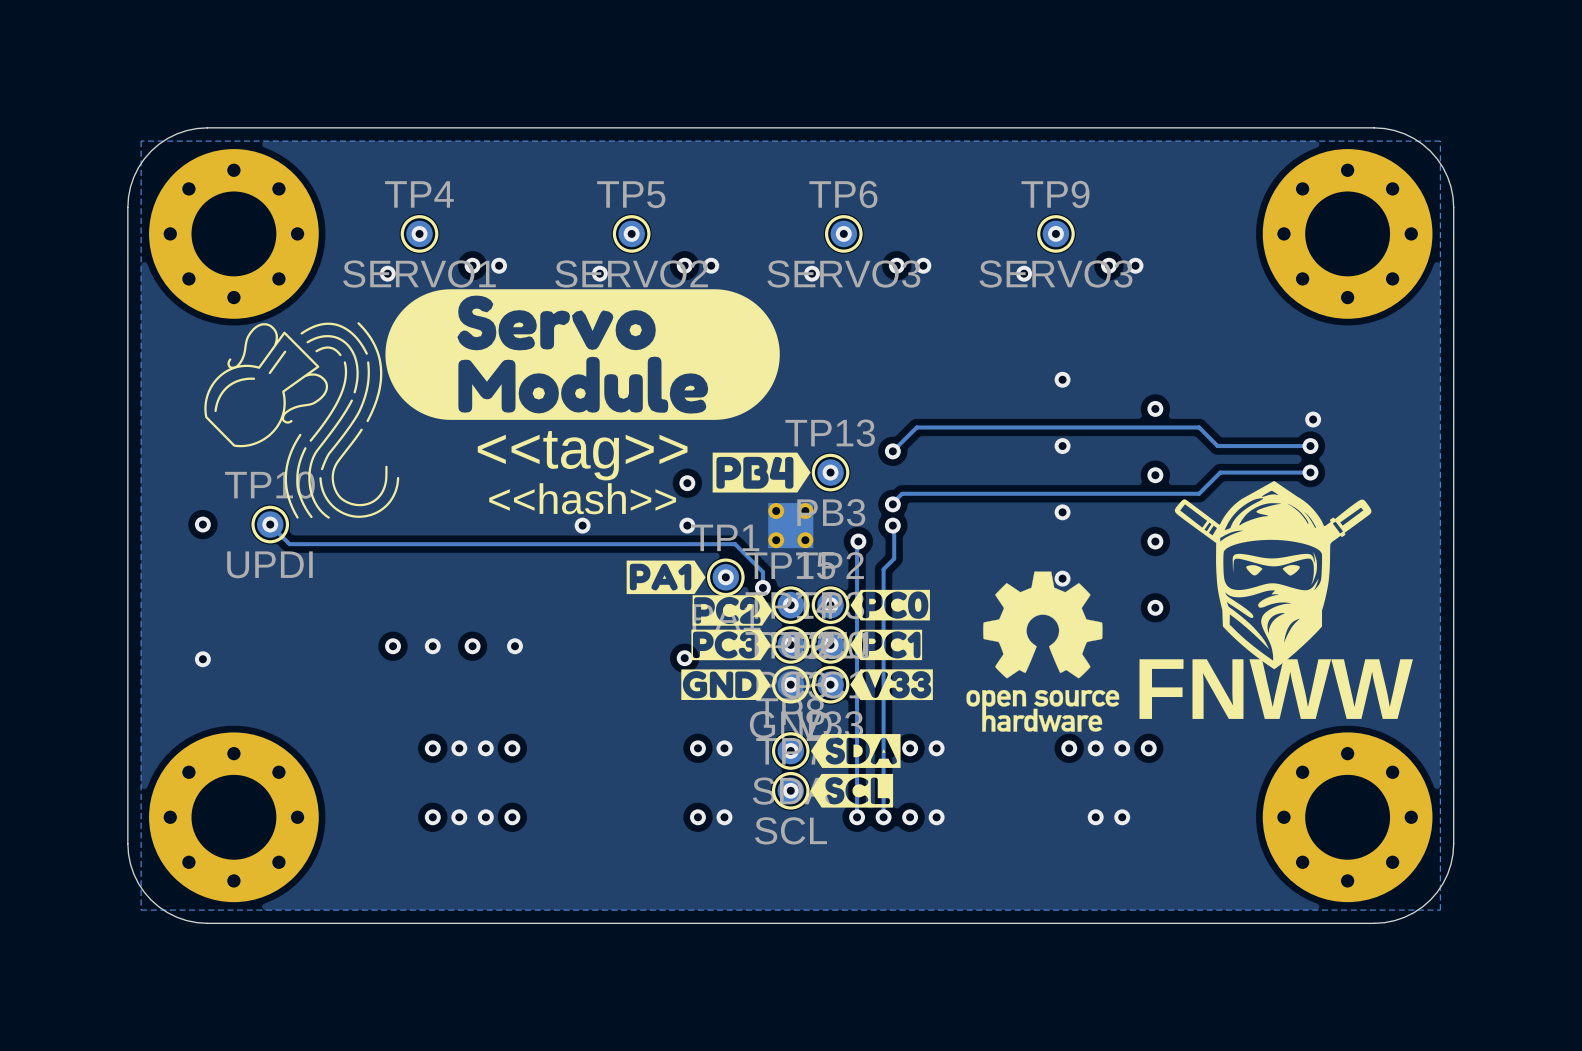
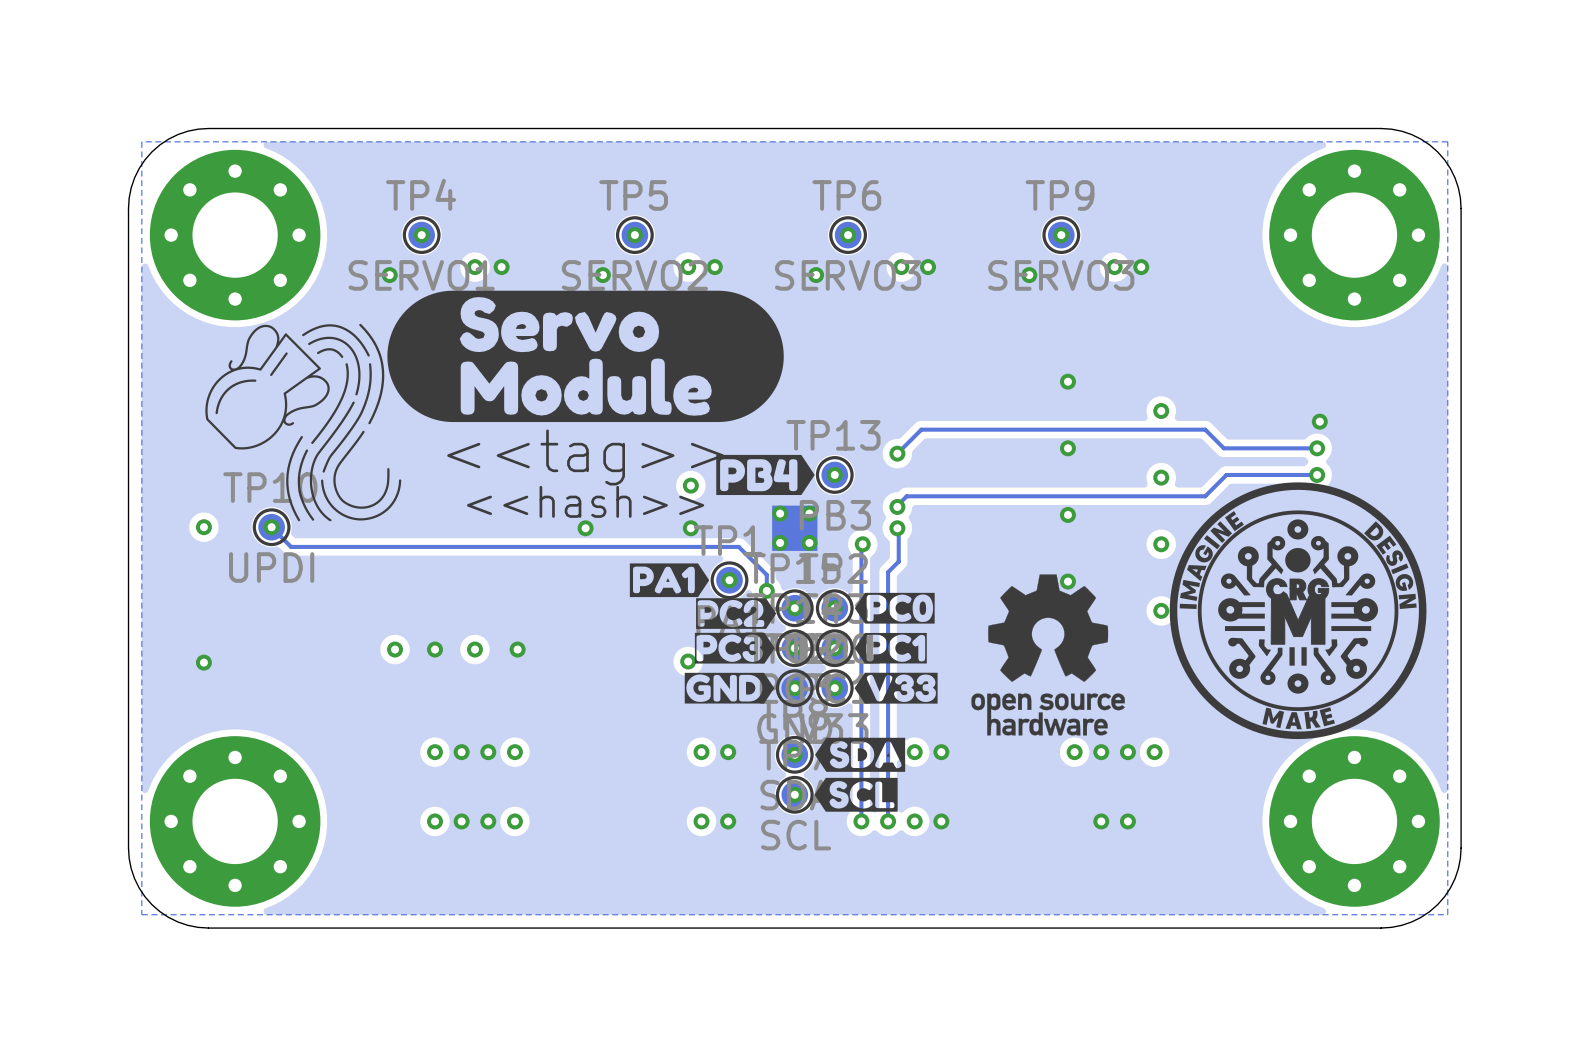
drawing: none -> [1169, 482, 1427, 740]
drawing: [1174, 480, 1372, 670] -> none
text: FNWW (1276, 689) -> none

